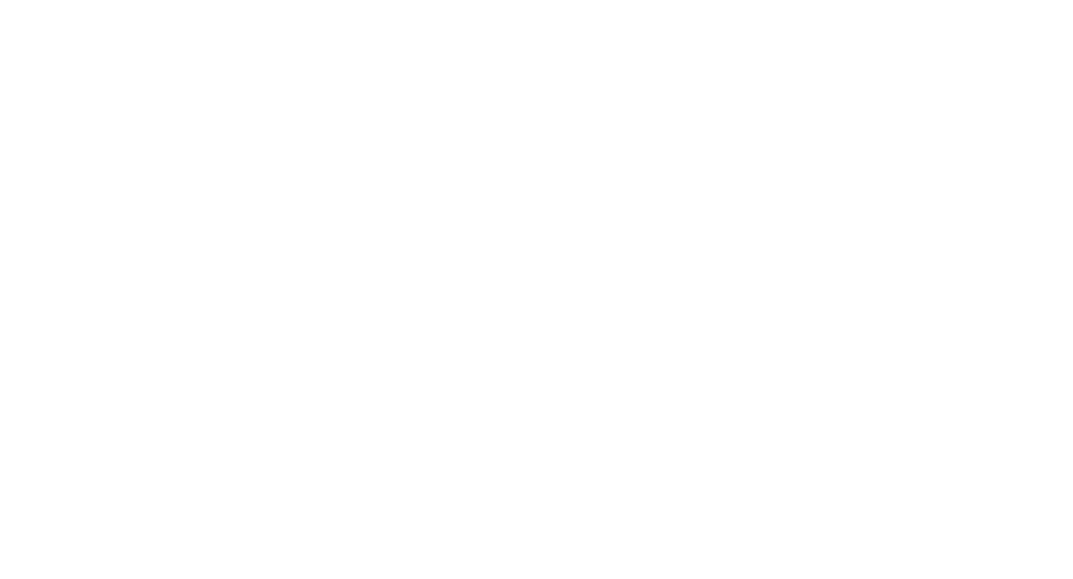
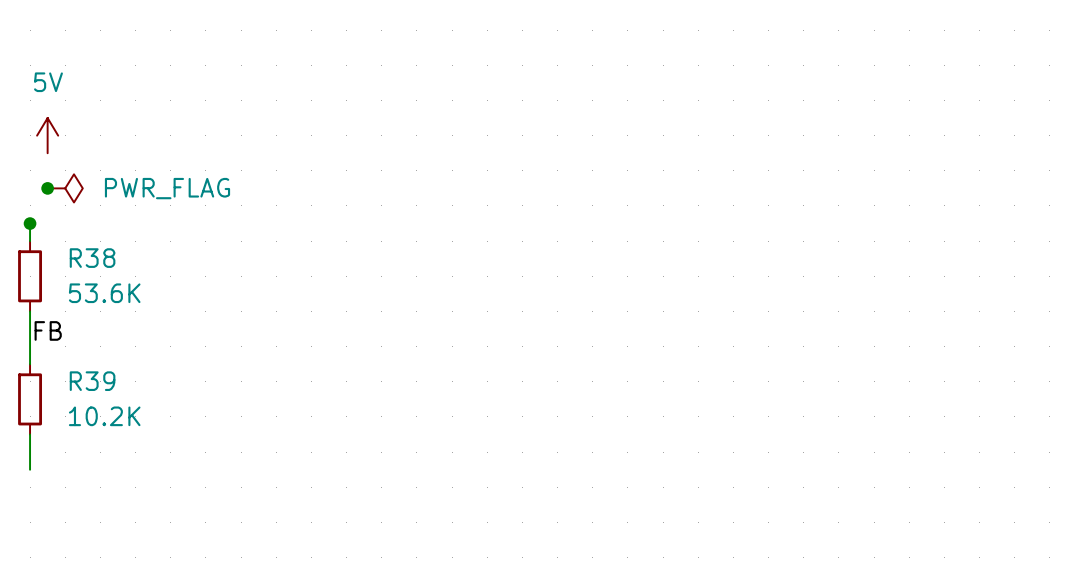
power symbol: none -> 5V (47, 135)
junction: none -> (47, 188)
power symbol: none -> PWR_FLAG (65, 188)
wire: none -> (30, 223) (30, 241)
junction: none -> (30, 223)
R38: none -> 53.6K (30, 276)
wire: none -> (30, 311) (30, 364)
label: none -> FB (48, 330)
R39: none -> 10.2K (30, 399)
wire: none -> (30, 434) (30, 469)

